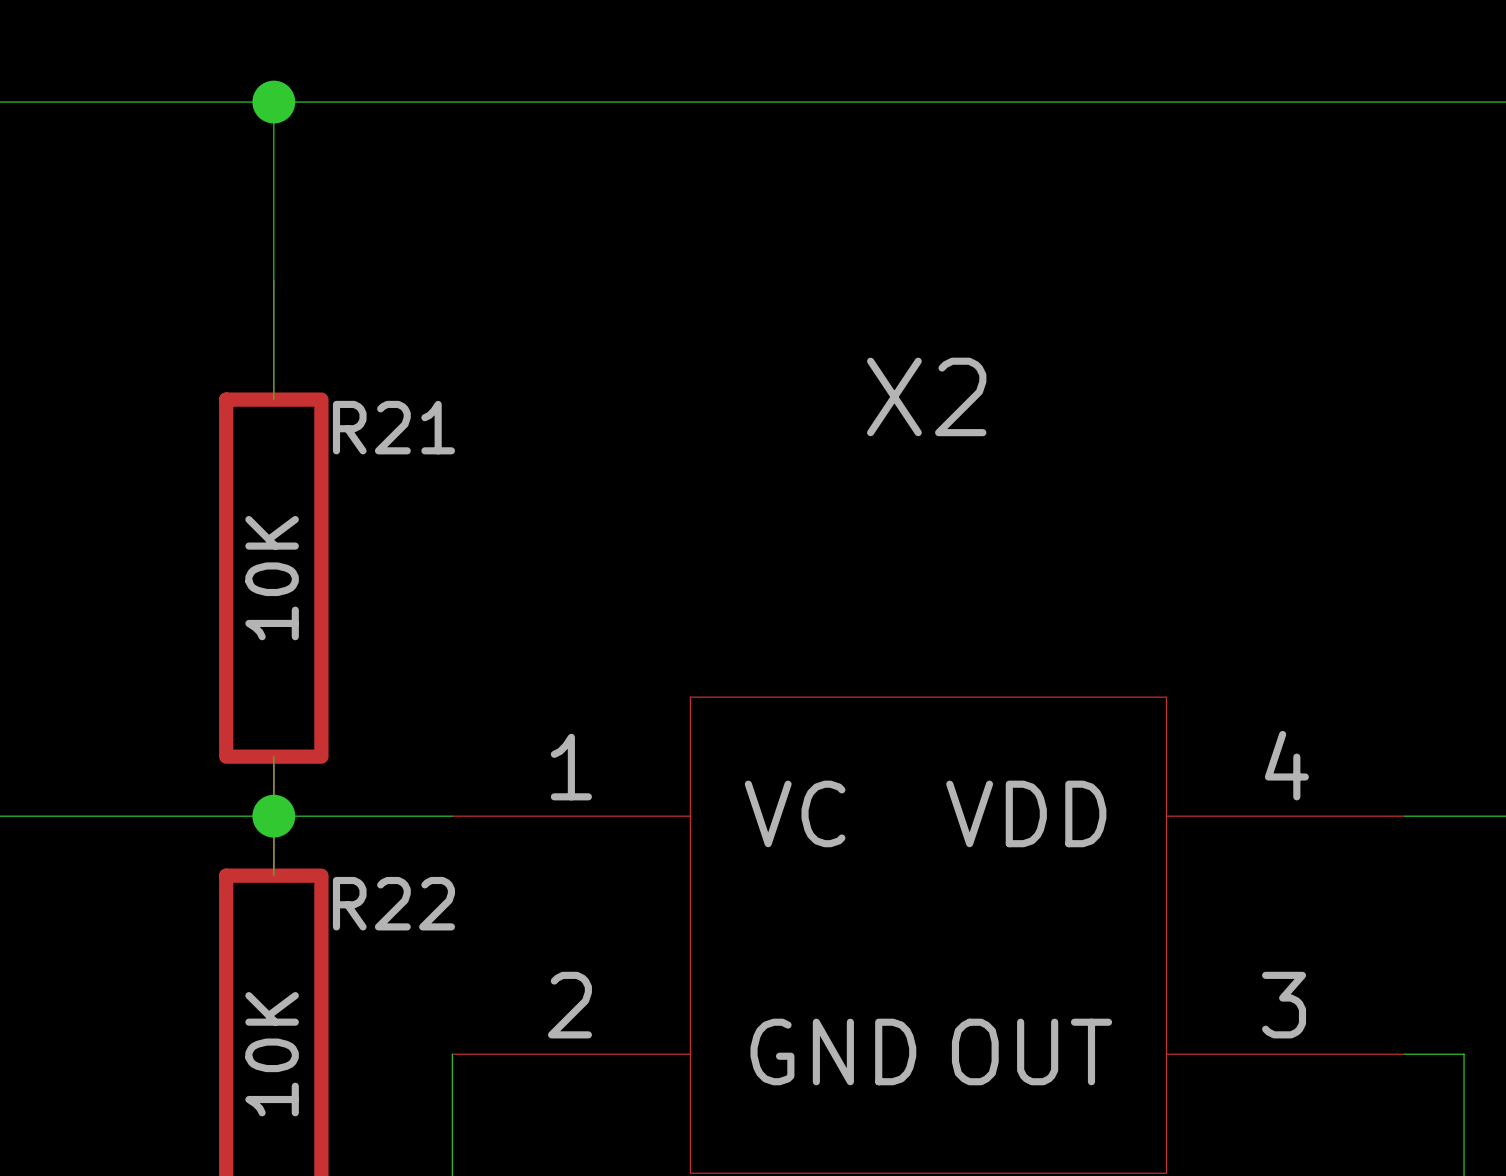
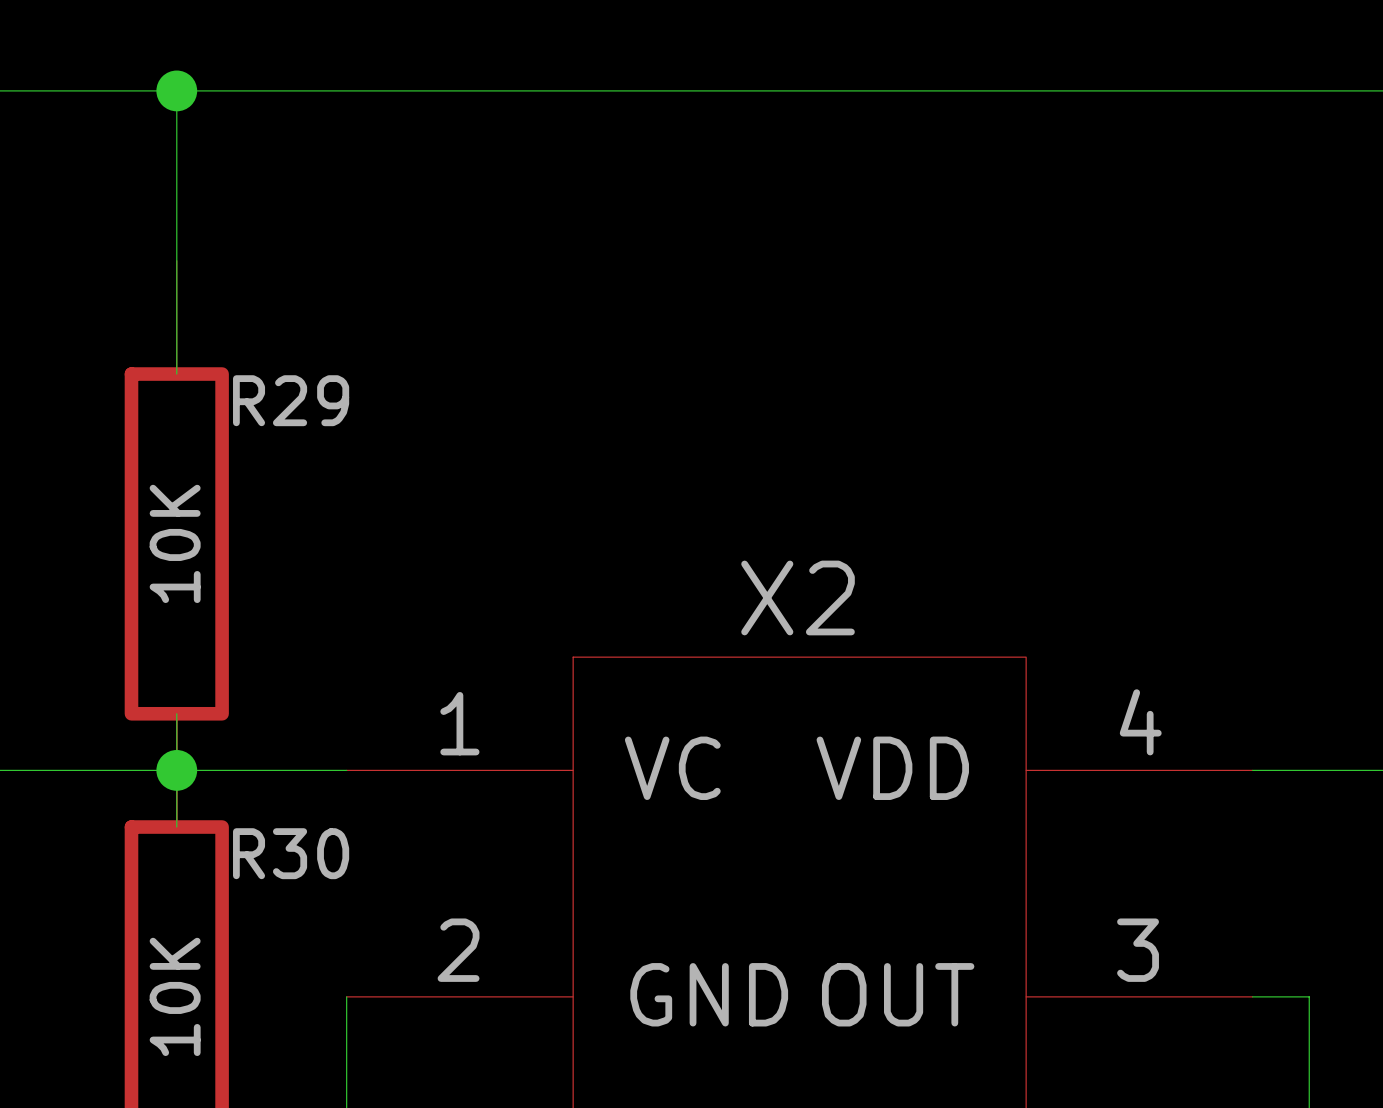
X2 name position: X2 (926, 396) -> X2 (798, 597)
R21 name: R21 (393, 427) -> R29 (291, 400)
R22 name: R22 (393, 903) -> R30 (291, 853)

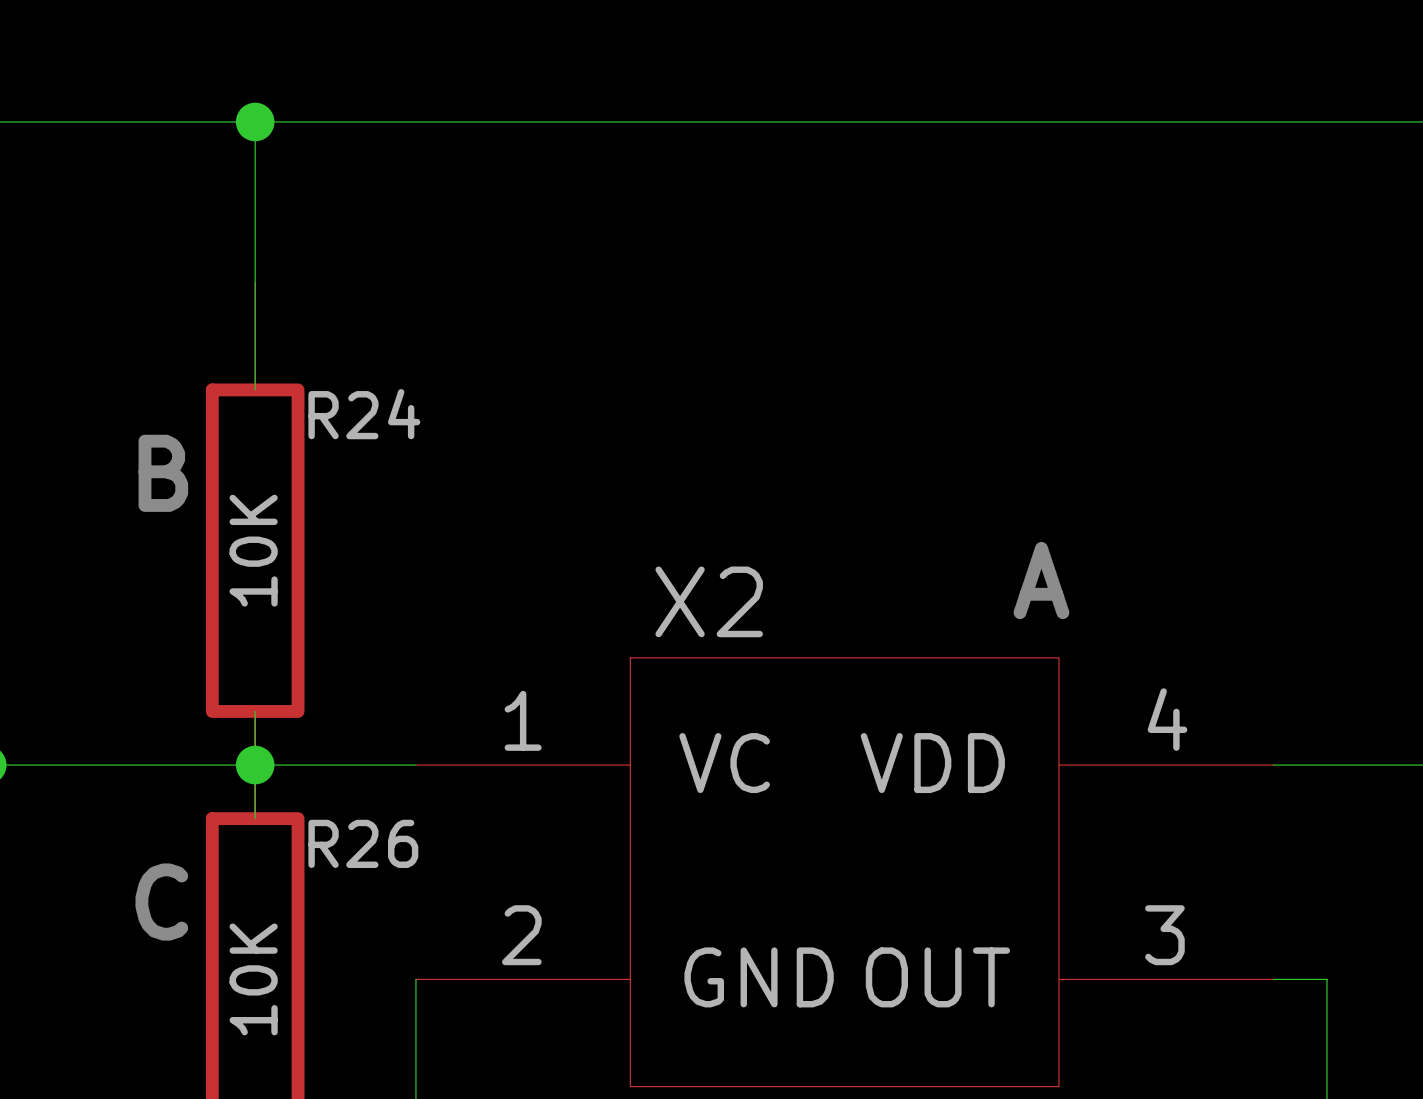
R29 name: R29 (291, 400) -> R24 (364, 414)
text: none -> B (163, 473)
text: none -> A (1041, 580)
X2 name position: X2 (798, 597) -> X2 (709, 601)
R30 name: R30 (291, 853) -> R26 (363, 843)
text: none -> C (161, 902)

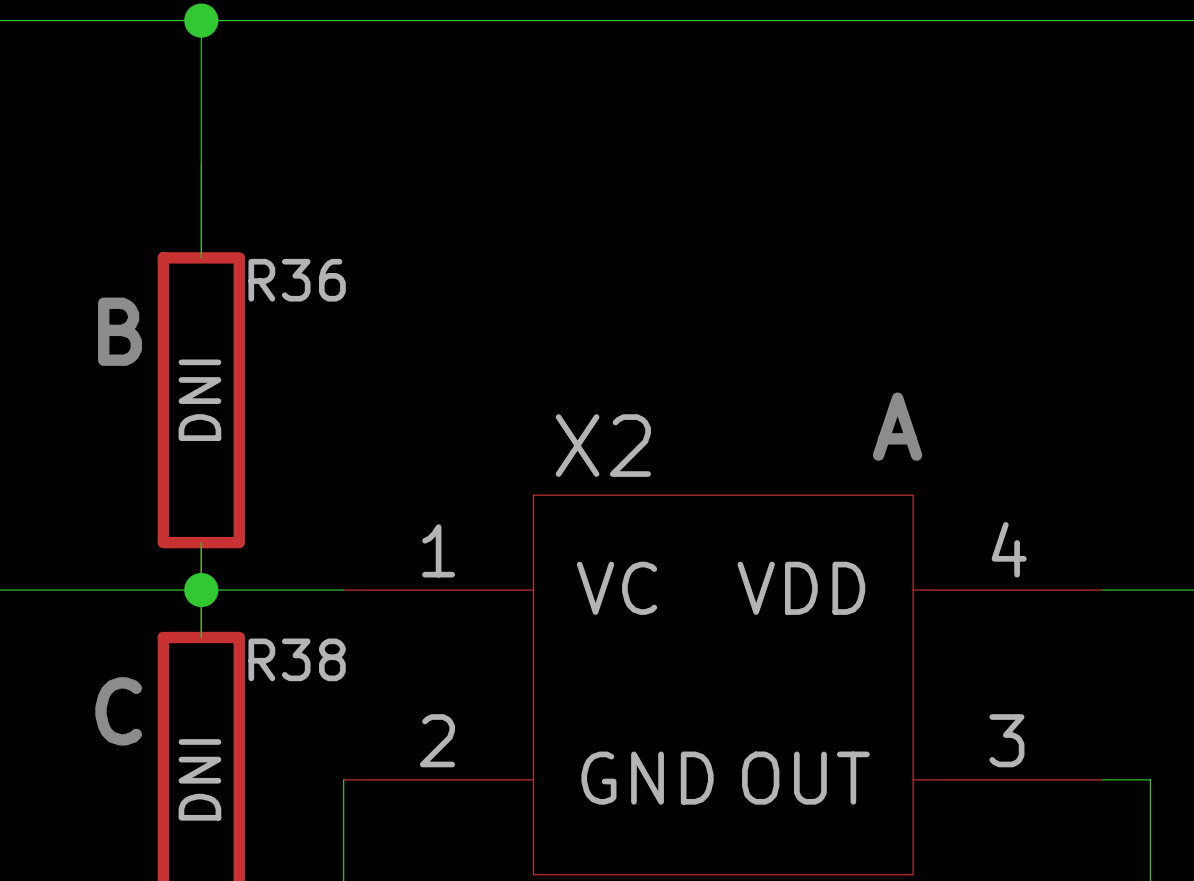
R24 name: R24 (364, 414) -> R36 (297, 280)
R24 value: 10K (253, 550) -> DNI (199, 400)
R26 name: R26 (363, 843) -> R38 (297, 659)
R26 value: 10K (253, 979) -> DNI (199, 779)

